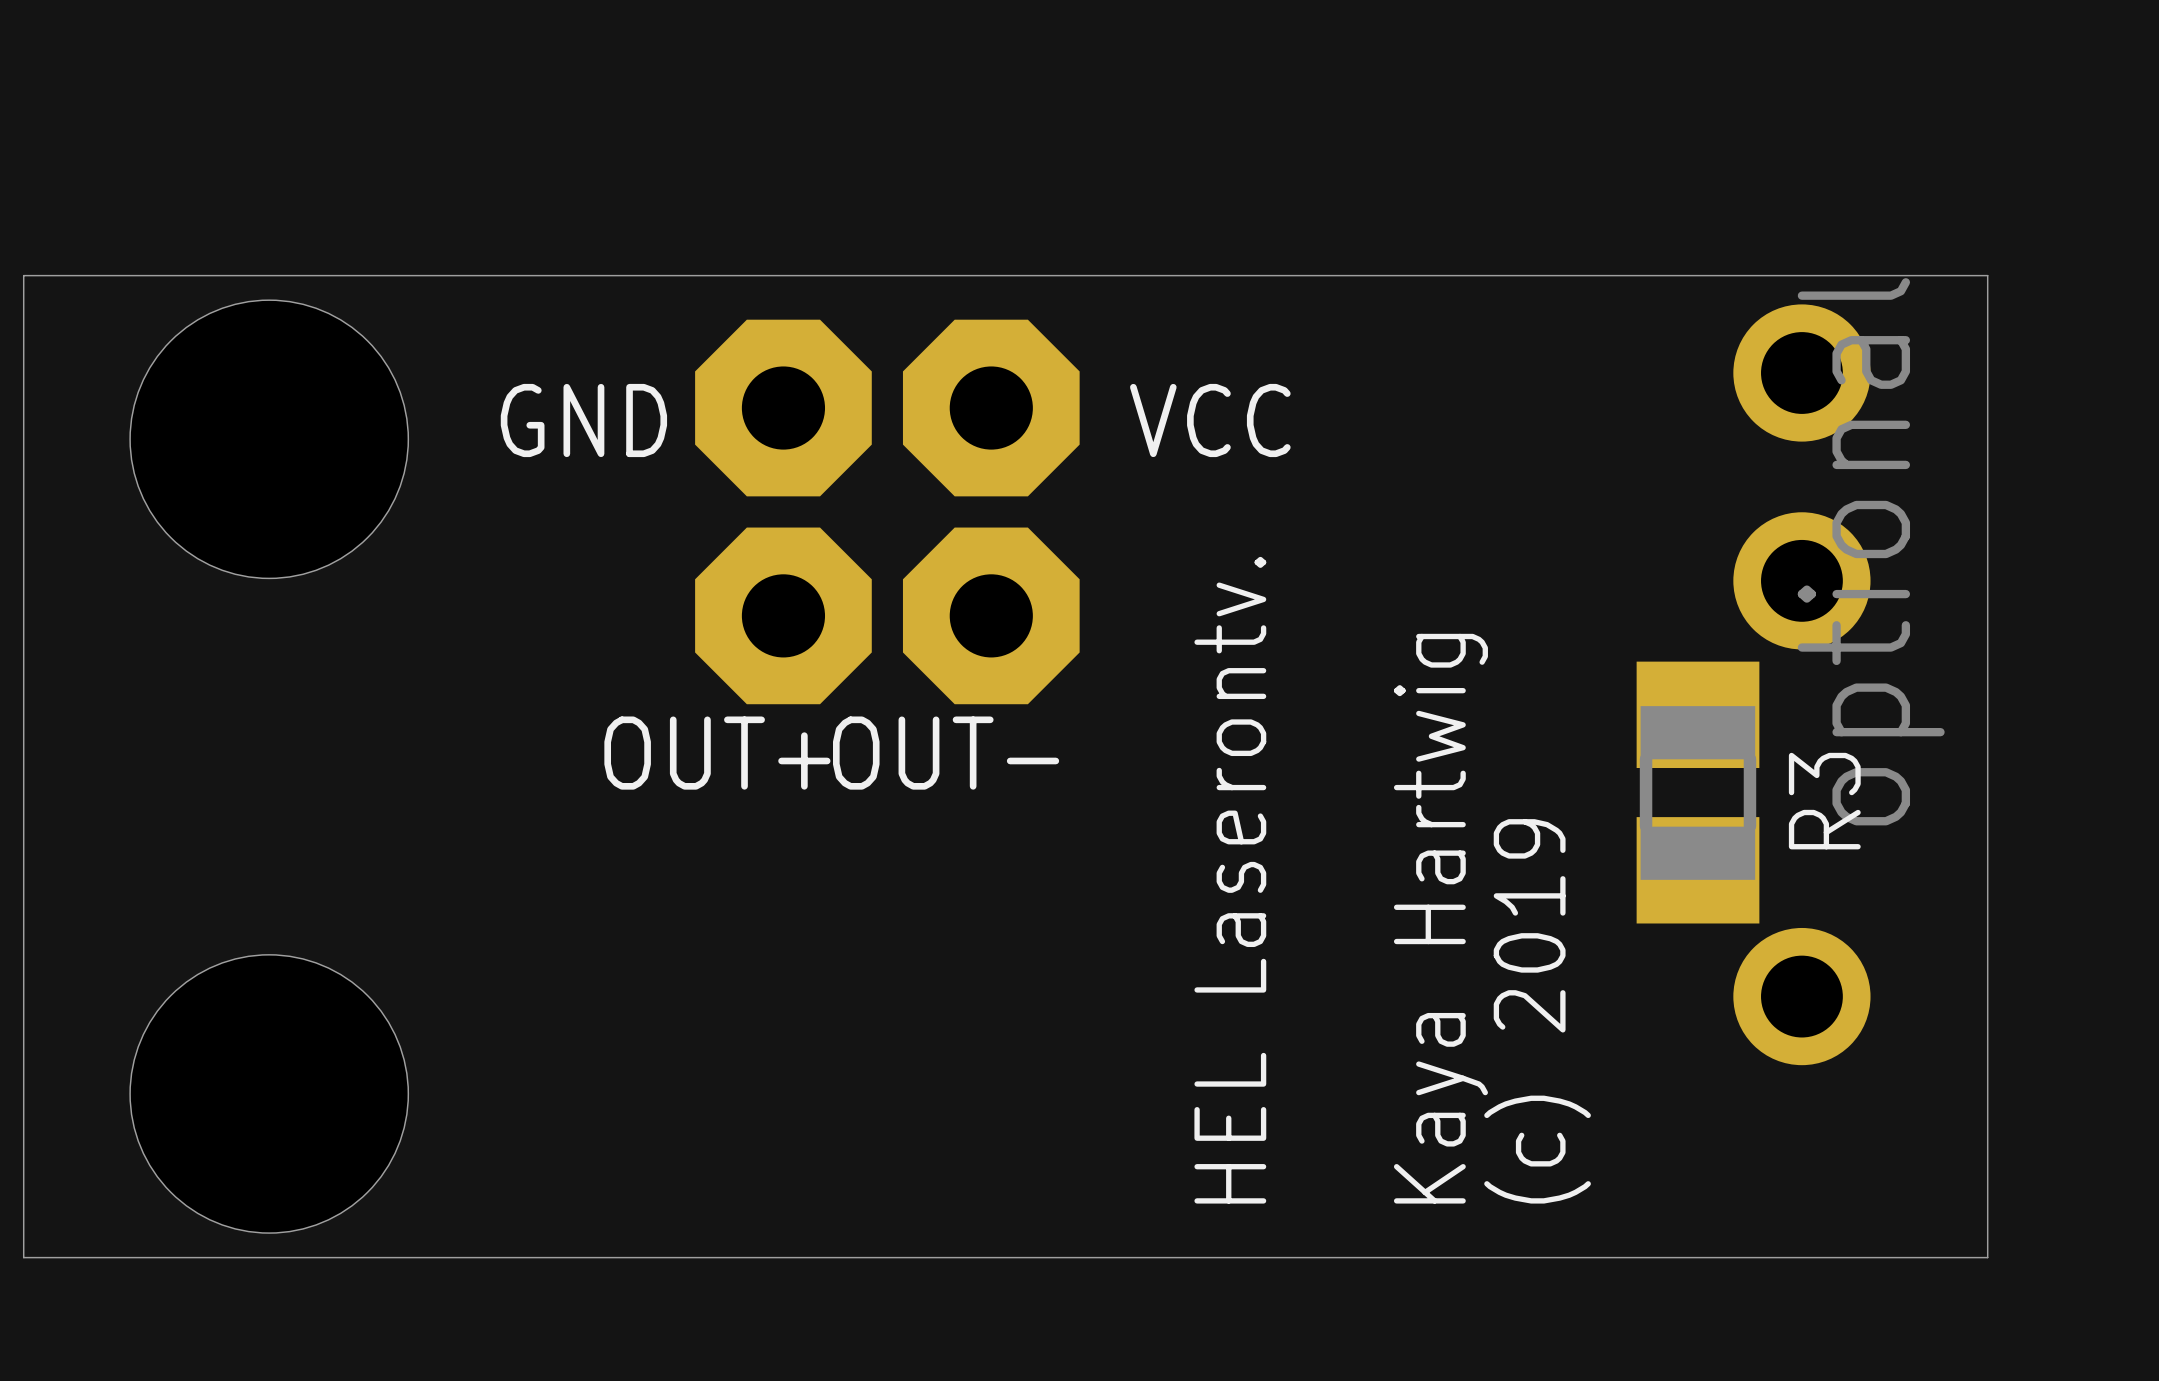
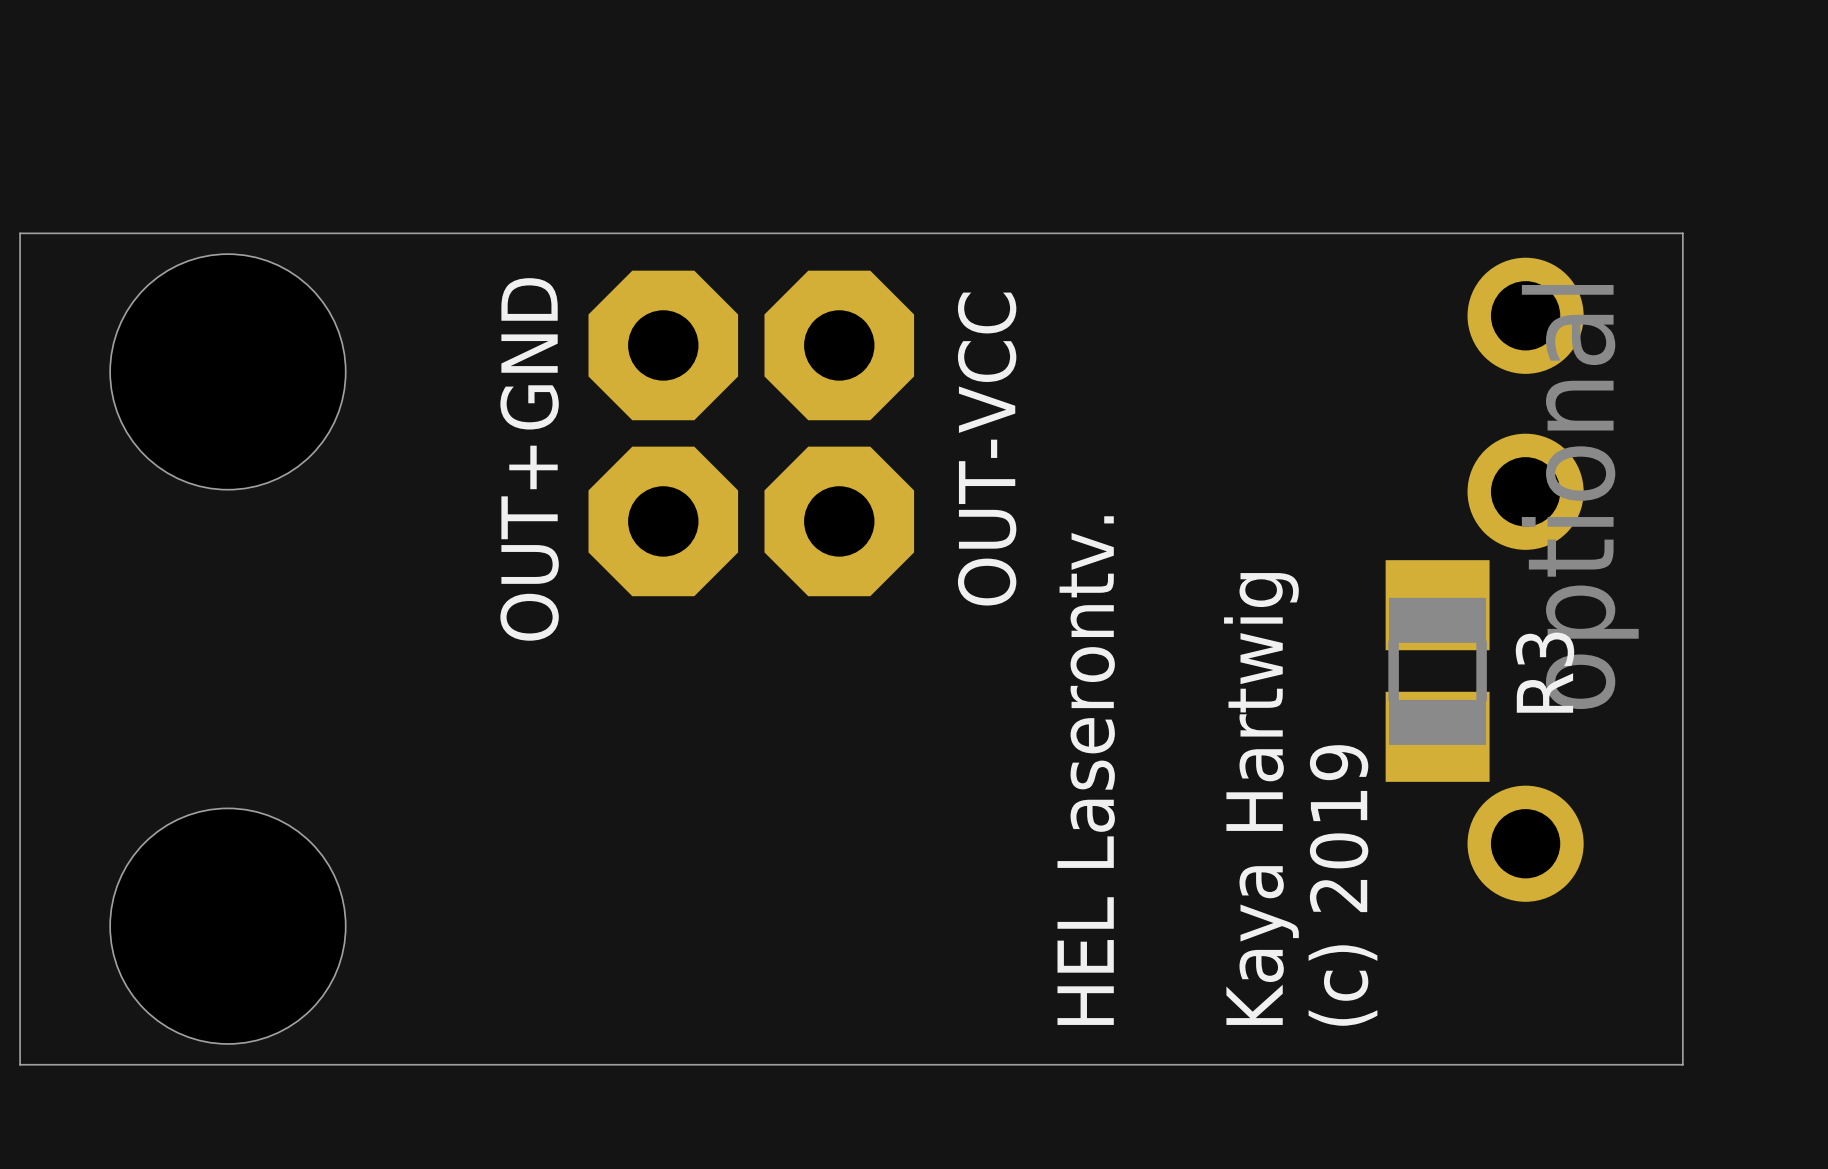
GND name rotation: 0° (583, 420) -> 90° counterclockwise (529, 353)
VCC name rotation: 0° (1210, 420) -> 90° counterclockwise (987, 362)
OUT+ name rotation: 0° (717, 753) -> 90° counterclockwise (529, 543)
OUT- name rotation: 0° (946, 753) -> 90° counterclockwise (987, 522)
OUT- name position: OUT- (946, 753) -> OUT- (987, 522)
text position: HEL Laserontv. (1230, 880) -> HEL Laserontv. (1086, 770)
text position: Kaya Hartwig (1440, 918) -> Kaya Hartwig (1261, 799)
text position: (c) 2019 (1537, 1011) -> (c) 2019 (1343, 885)

